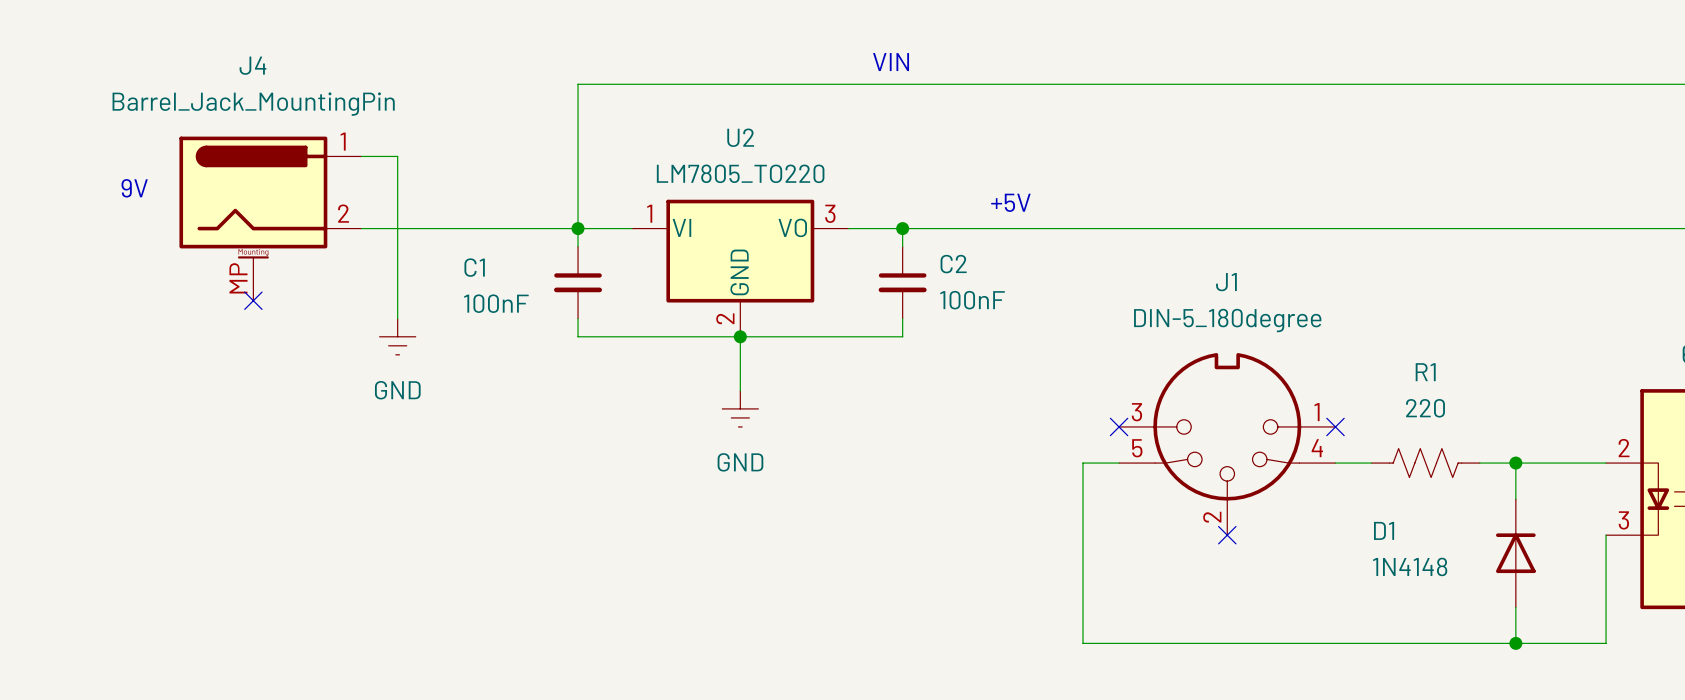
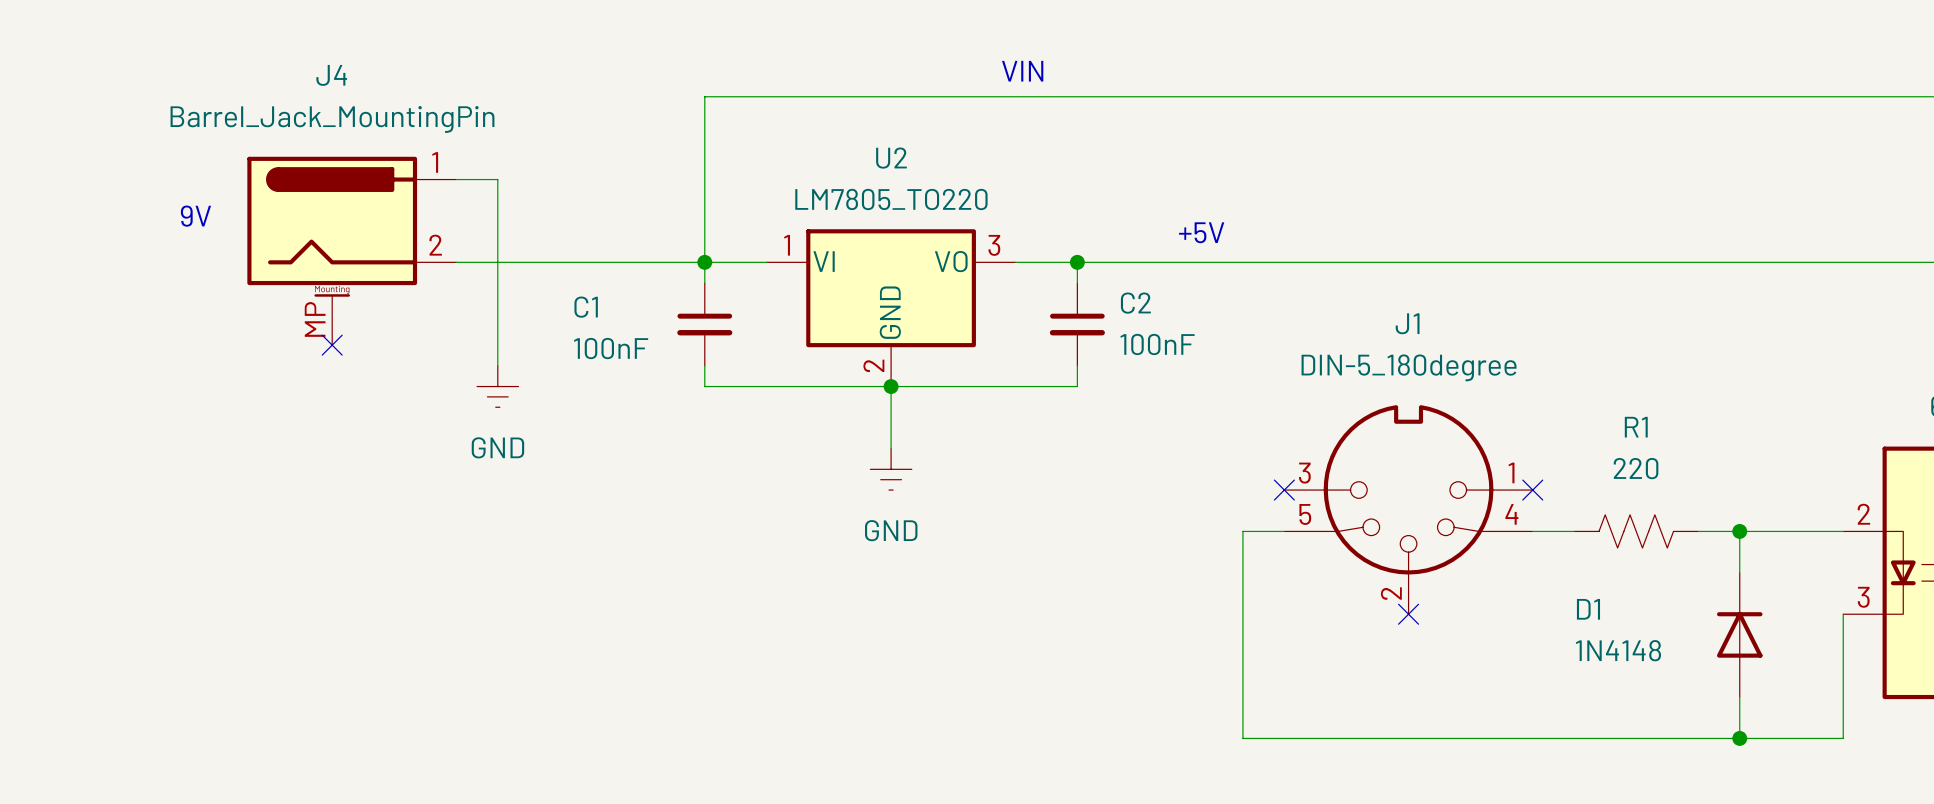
wire: (614, 84) (578, 84) (578, 246) -> (704, 96) (704, 283)
wire: (361, 156) (397, 156) (397, 318) -> (456, 179) (497, 179) (497, 365)
text position: 9V (134, 188) -> 9V (195, 216)
text position: +5V (1010, 202) -> +5V (1201, 232)
J4 position: (270, 218) -> (351, 250)
junction position: (578, 228) -> (704, 262)
wire: (902, 228) (902, 246) -> (1077, 262) (1077, 283)
junction position: (902, 228) -> (1077, 262)
U2 position: (740, 268) -> (891, 307)
C1 position: (578, 282) -> (704, 324)
C2 position: (902, 282) -> (1077, 324)
no-connect mark position: (253, 300) -> (332, 345)
wire: (578, 318) (578, 336) (614, 336) -> (704, 365) (704, 386)
wire: (902, 318) (902, 336) -> (1077, 365) (1077, 386) (1035, 386)
power symbol position: GND (397, 336) -> GND (497, 386)
wire: (740, 336) (740, 390) -> (891, 386) (891, 448)
junction position: (740, 336) -> (891, 386)
power symbol position: GND (740, 408) -> GND (891, 469)

